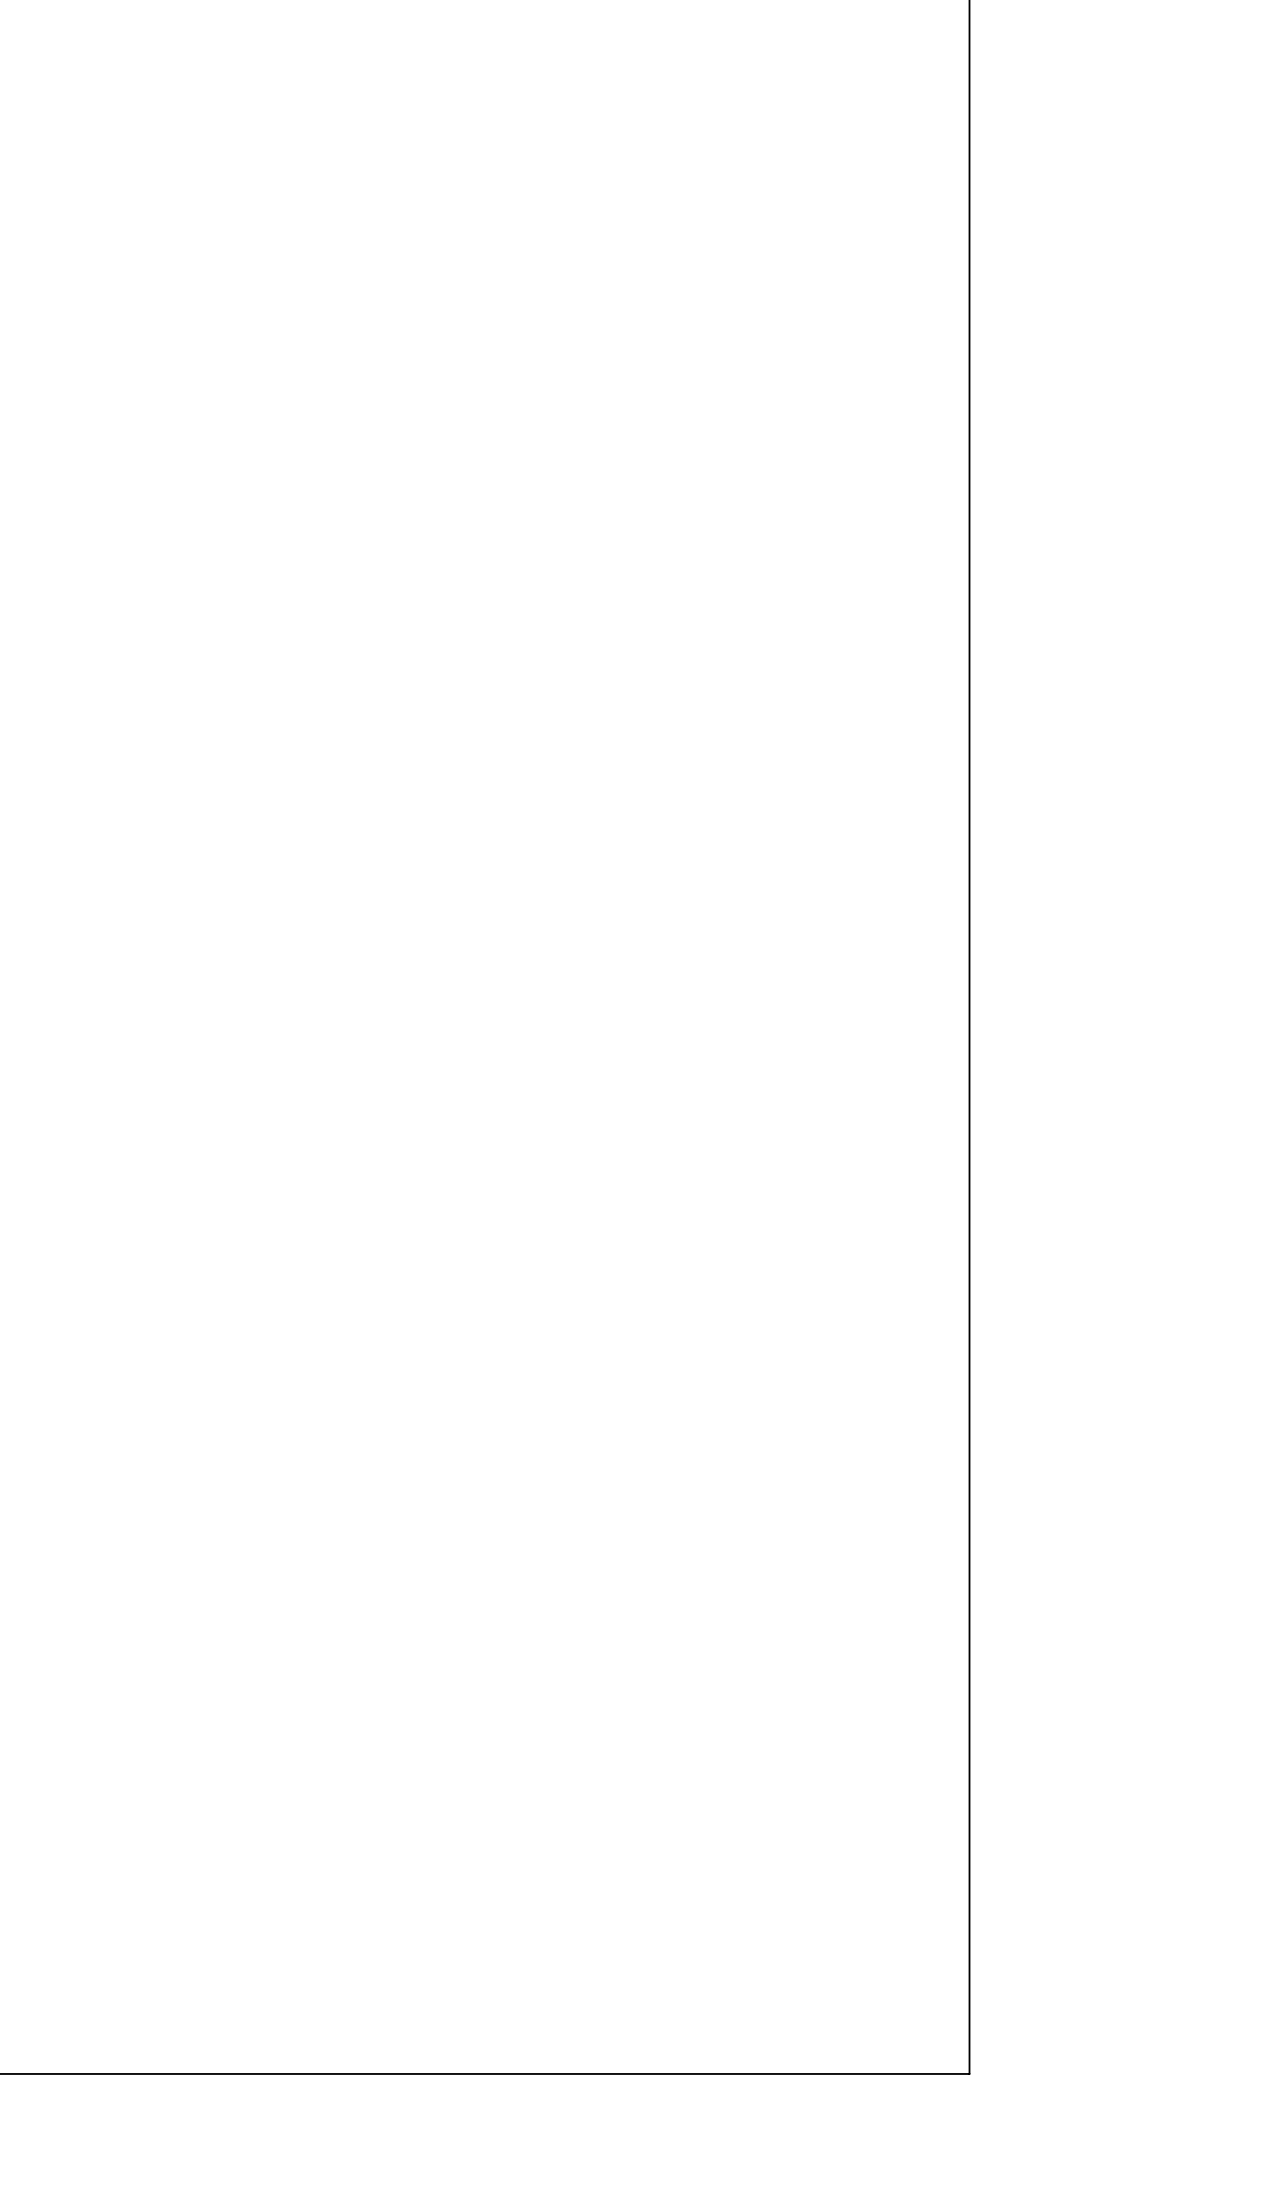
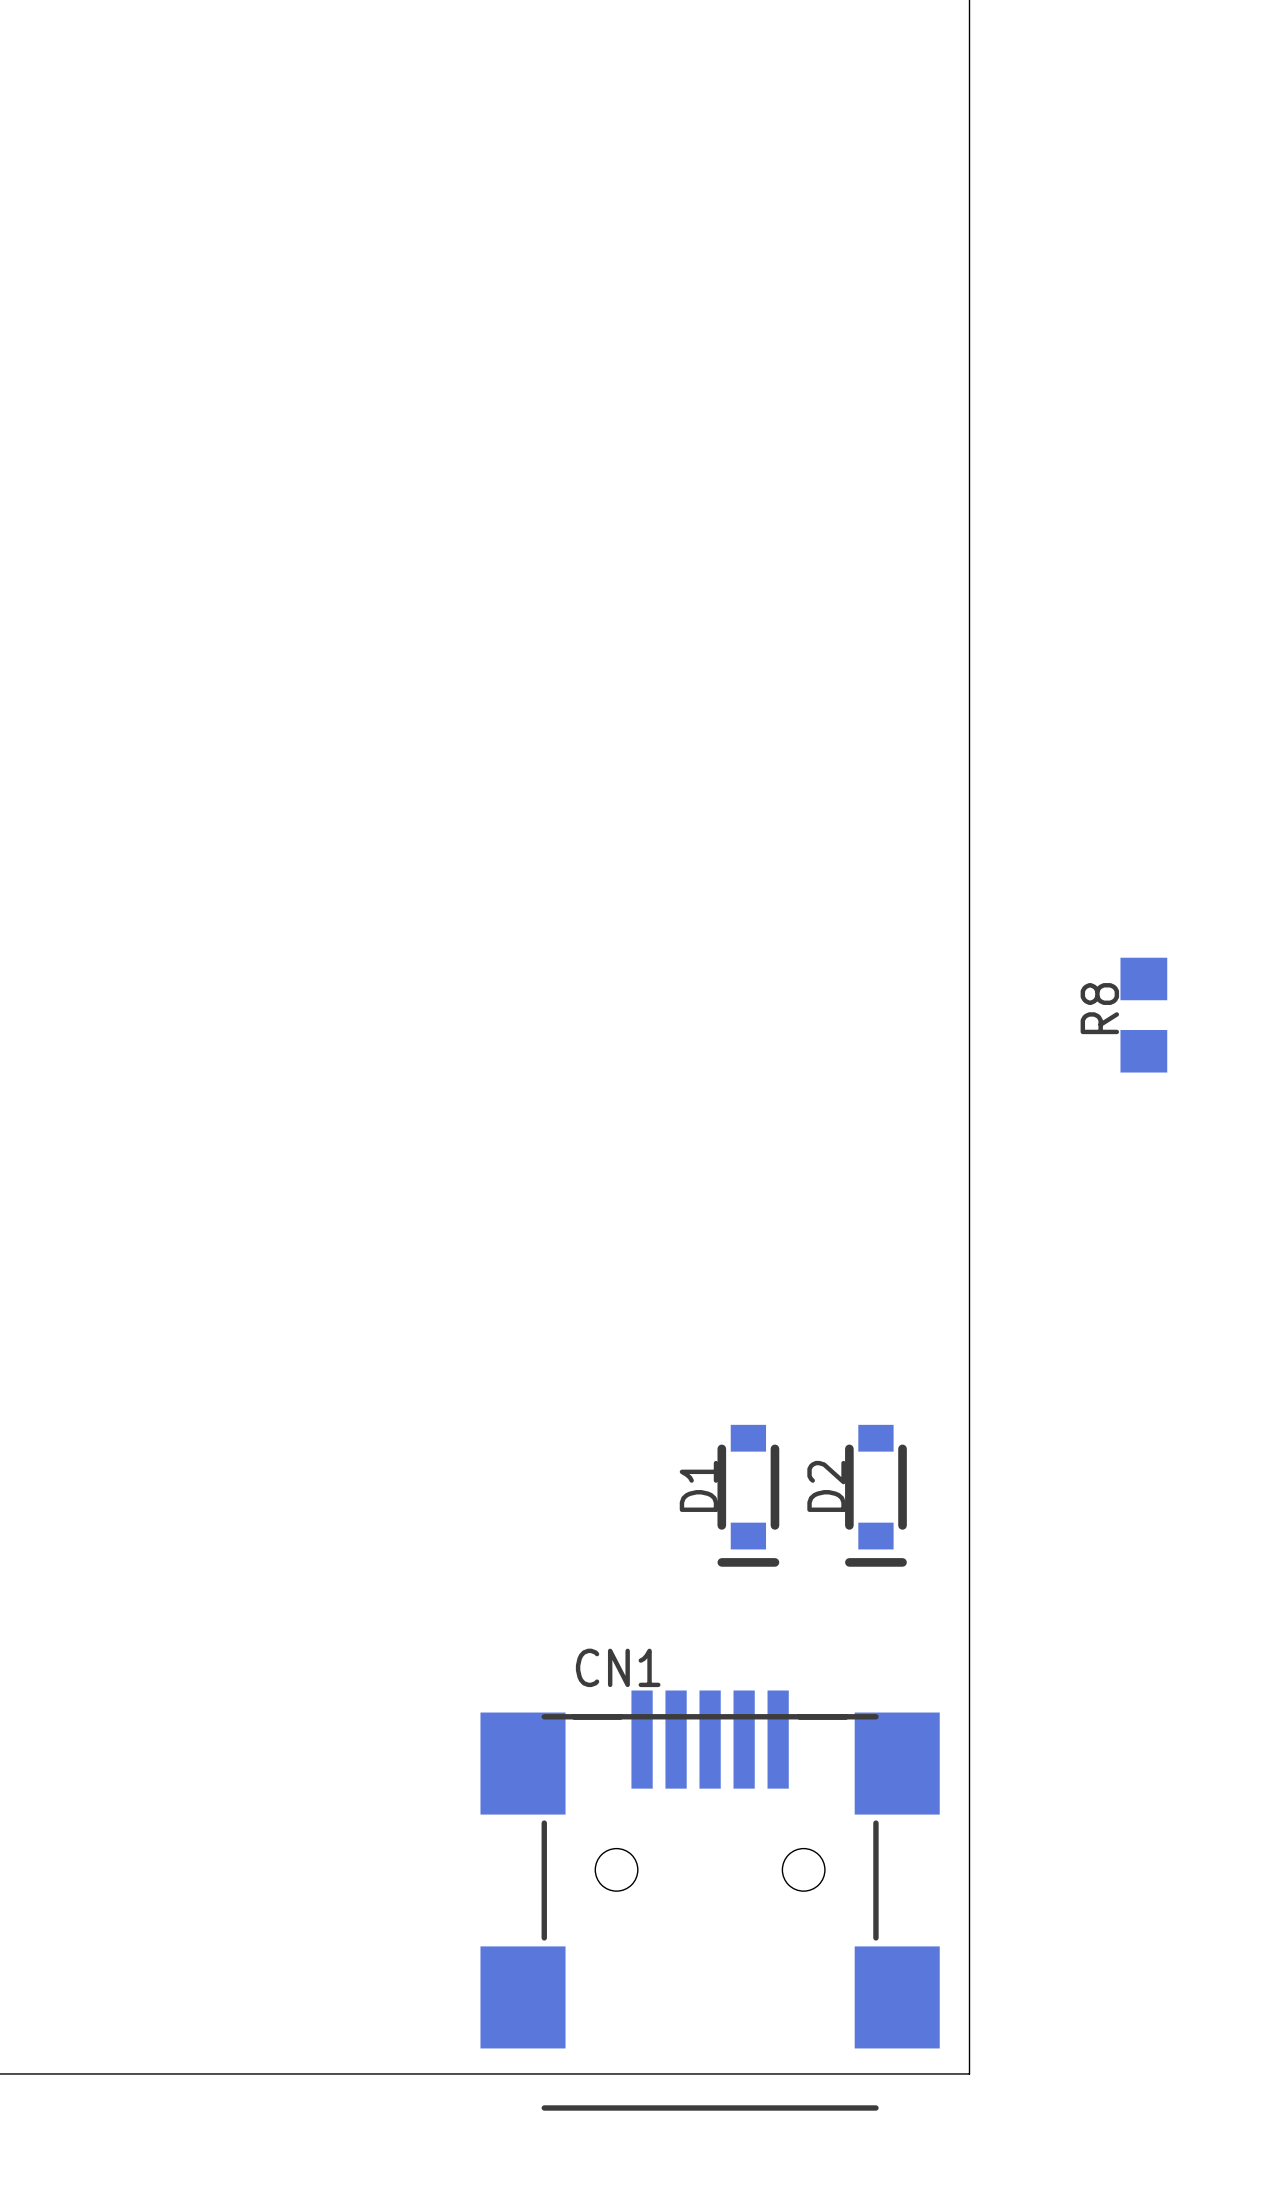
R8: none -> (1143, 1015)
D1: none -> (748, 1495)
D2: none -> (875, 1495)
CN1: none -> (710, 1900)

